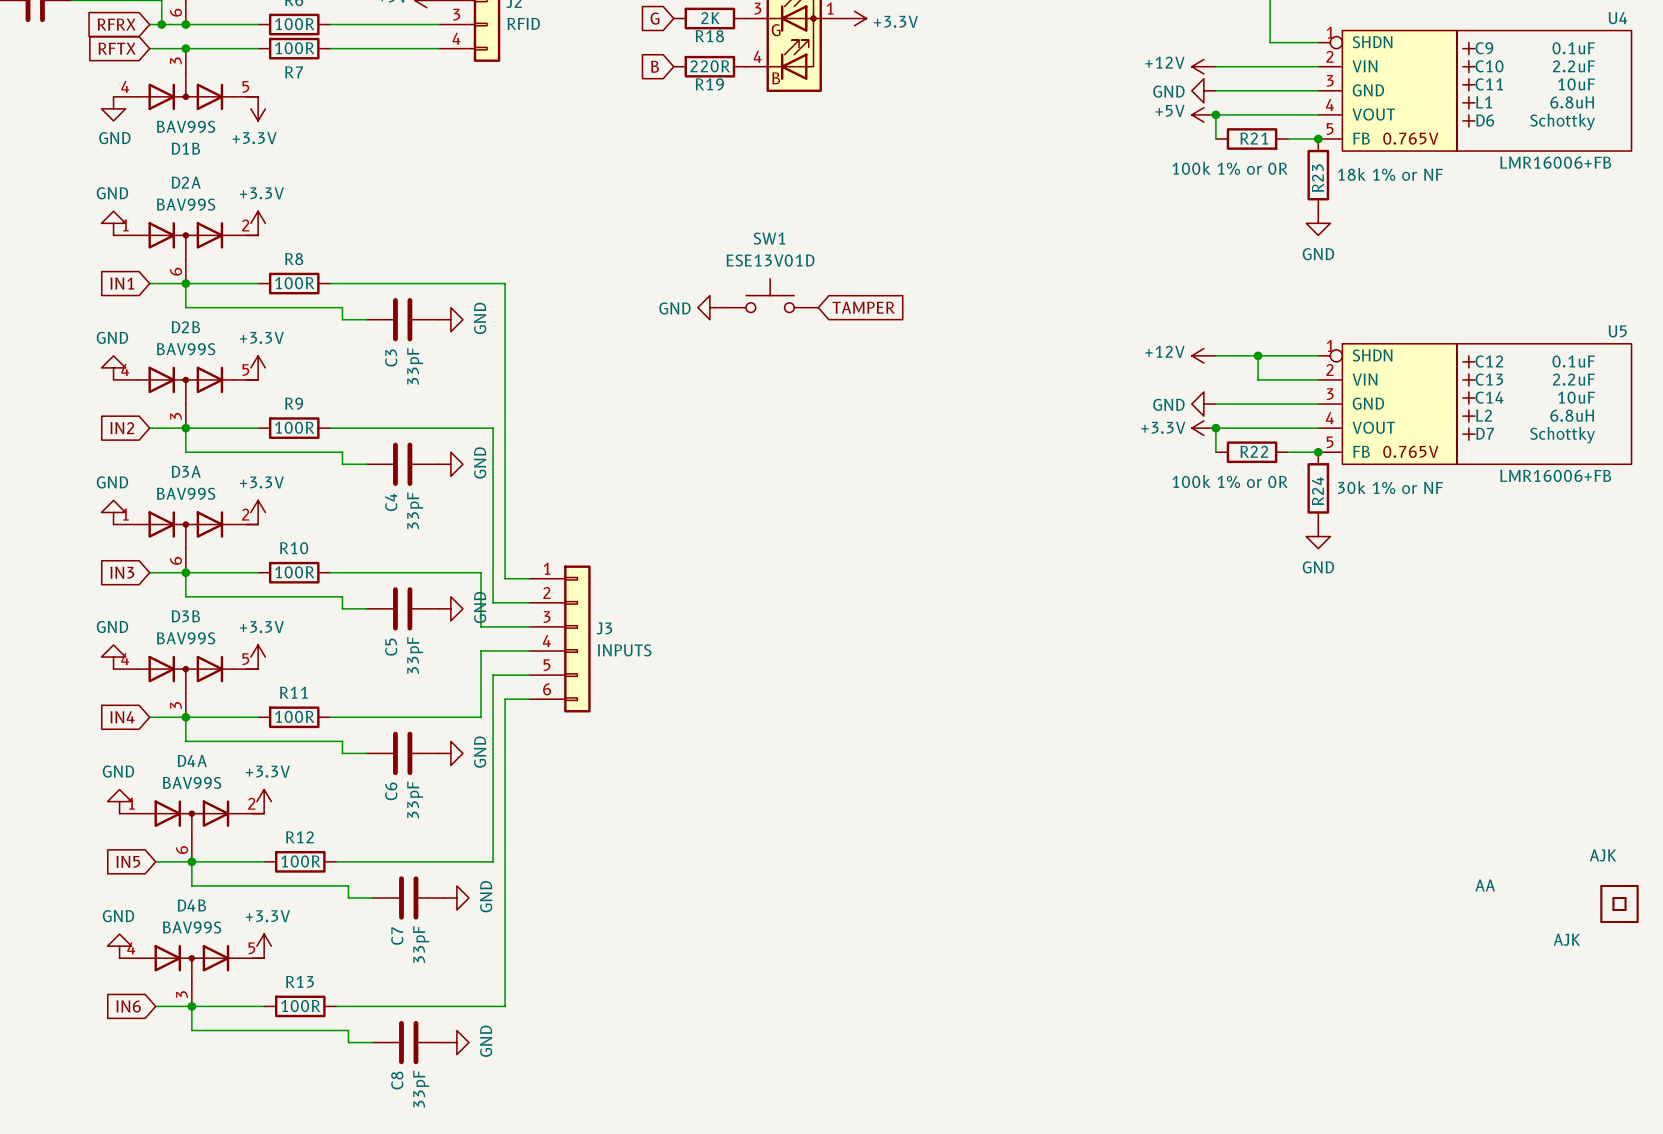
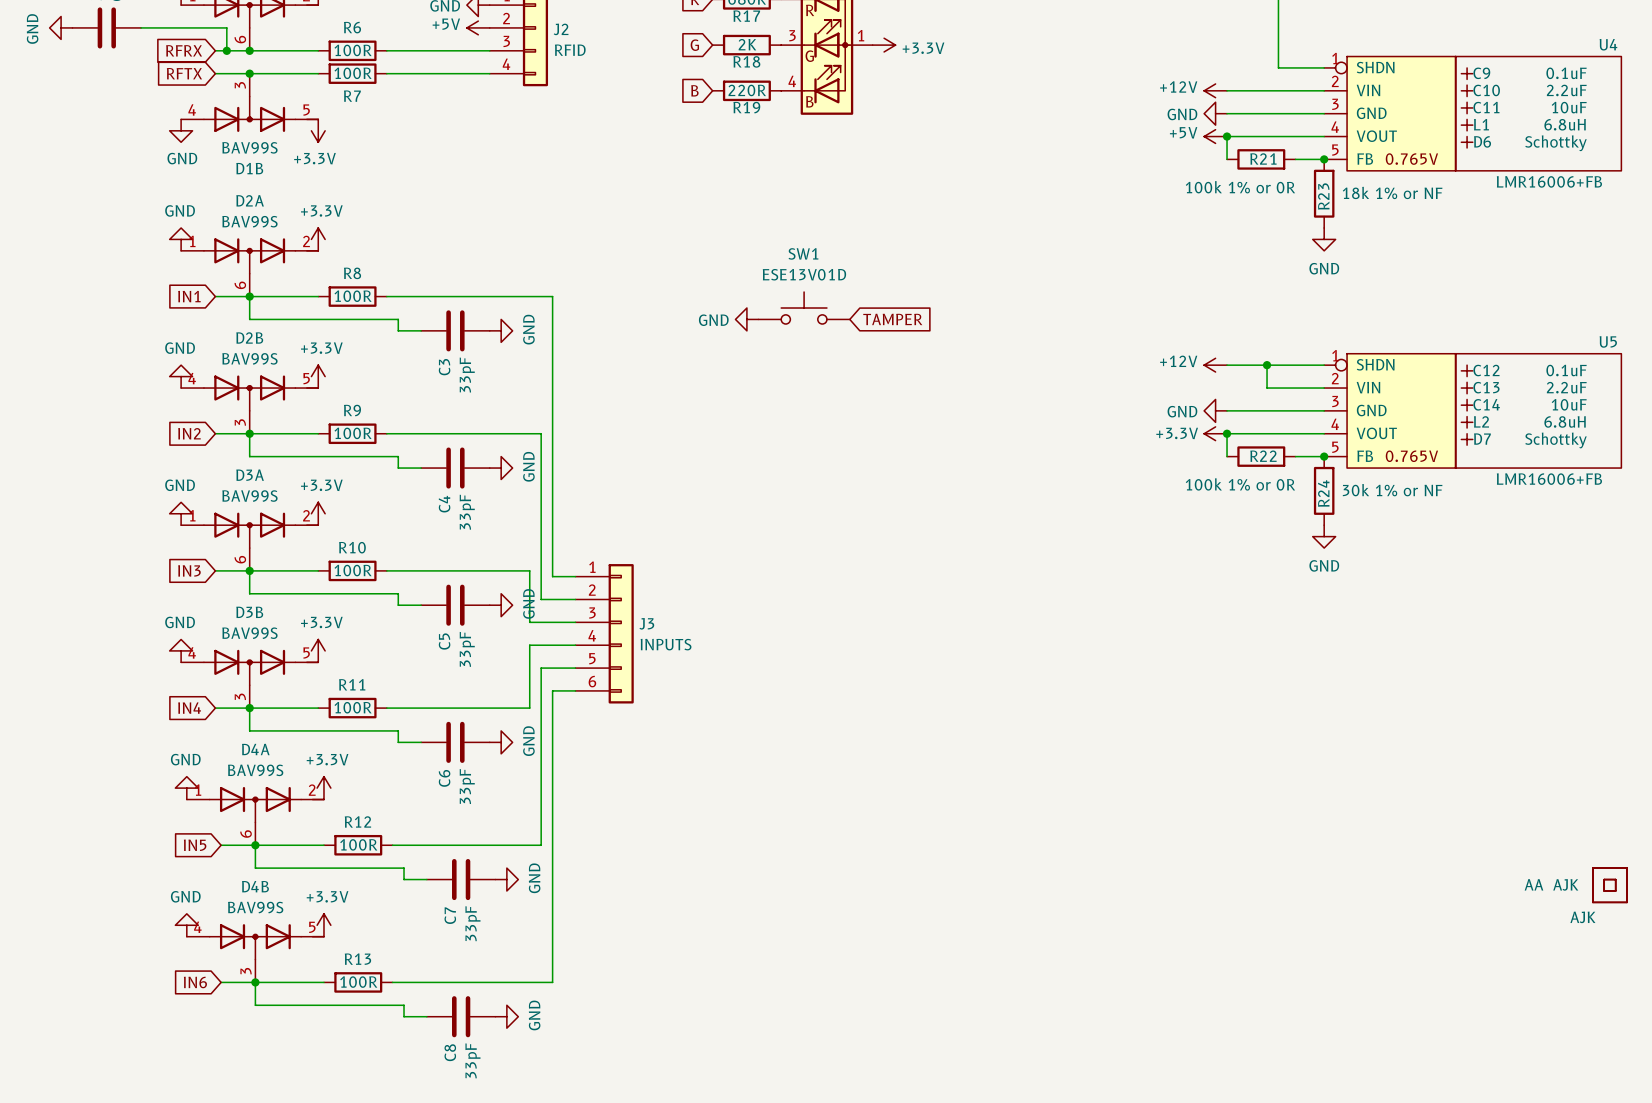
part: AJK (1603, 855) -> none
part position: (1485, 885) -> (1533, 884)
part: none -> AJK (1565, 884)
part: none -> AJK (1582, 917)
part: AJK (1566, 939) -> none

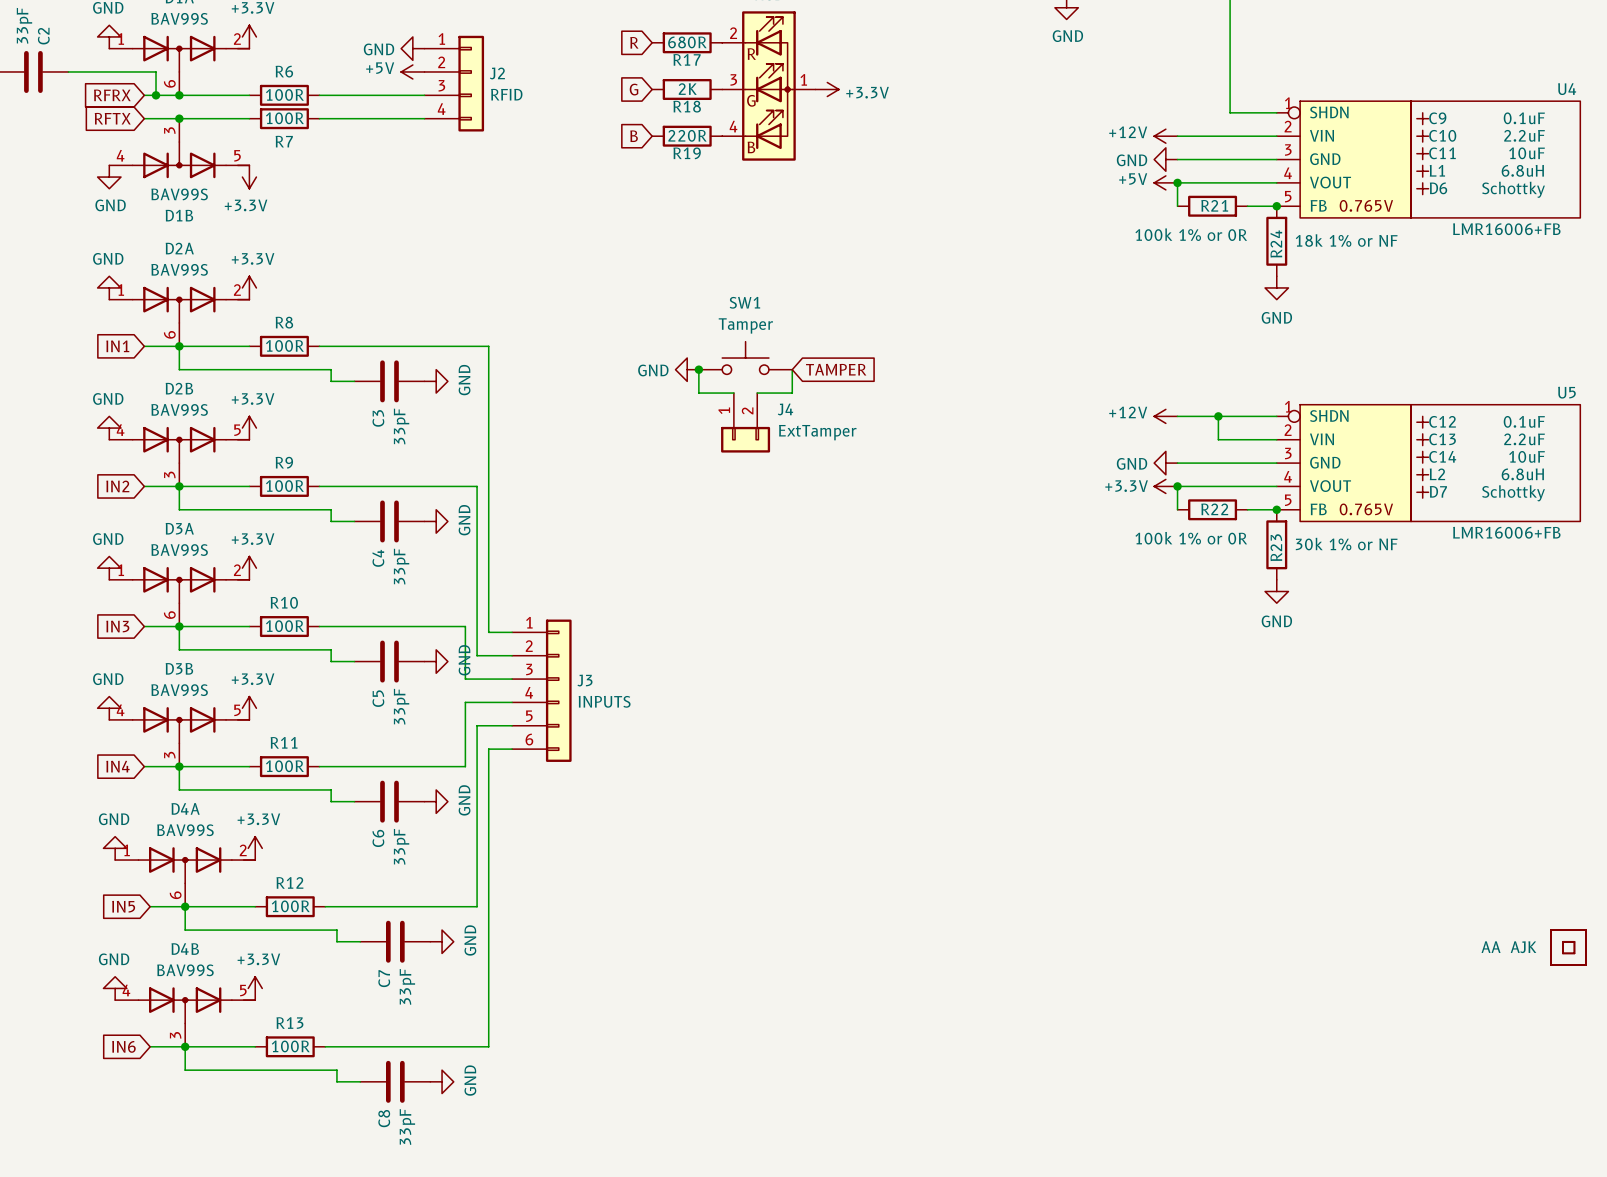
R23 name: R23 (1323, 196) -> R24 (1276, 243)
SW1 value: ESE13V01D (804, 274) -> Tamper (745, 325)
wire: none -> (698, 369) (698, 393) (733, 393)
junction: none -> (698, 369)
wire: none -> (792, 369) (792, 393) (757, 393)
J4: none -> ExtTamper (745, 422)
R24 name: R24 (1323, 493) -> R23 (1276, 547)
part: AJK (1582, 917) -> none

